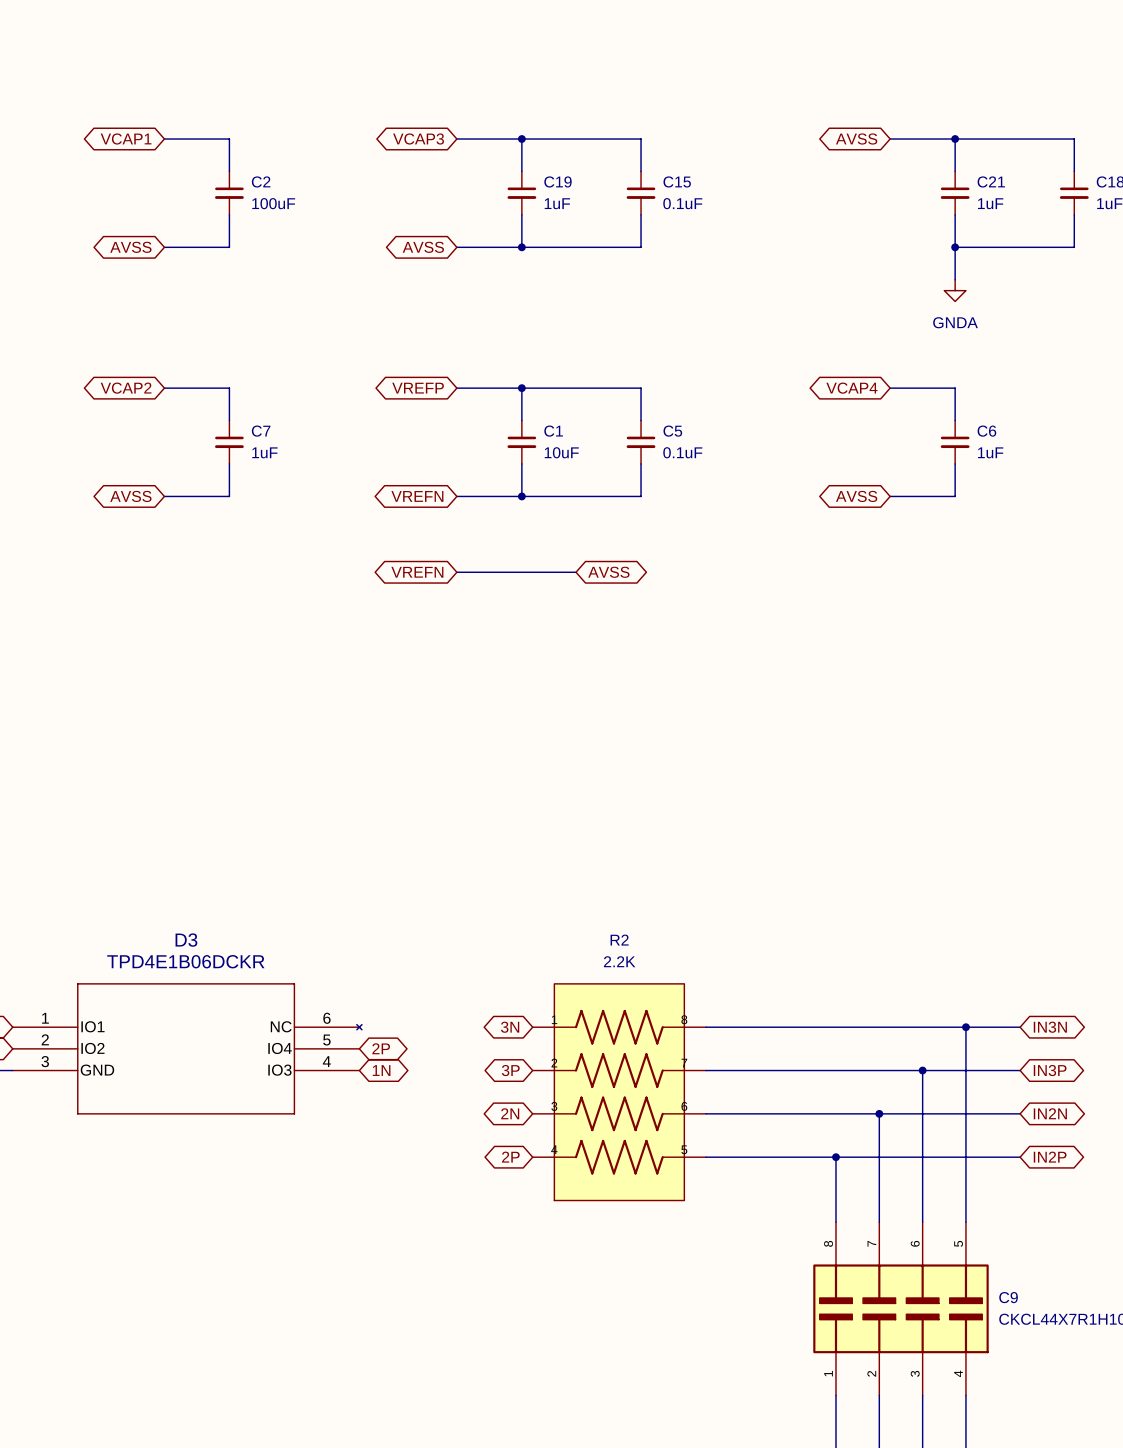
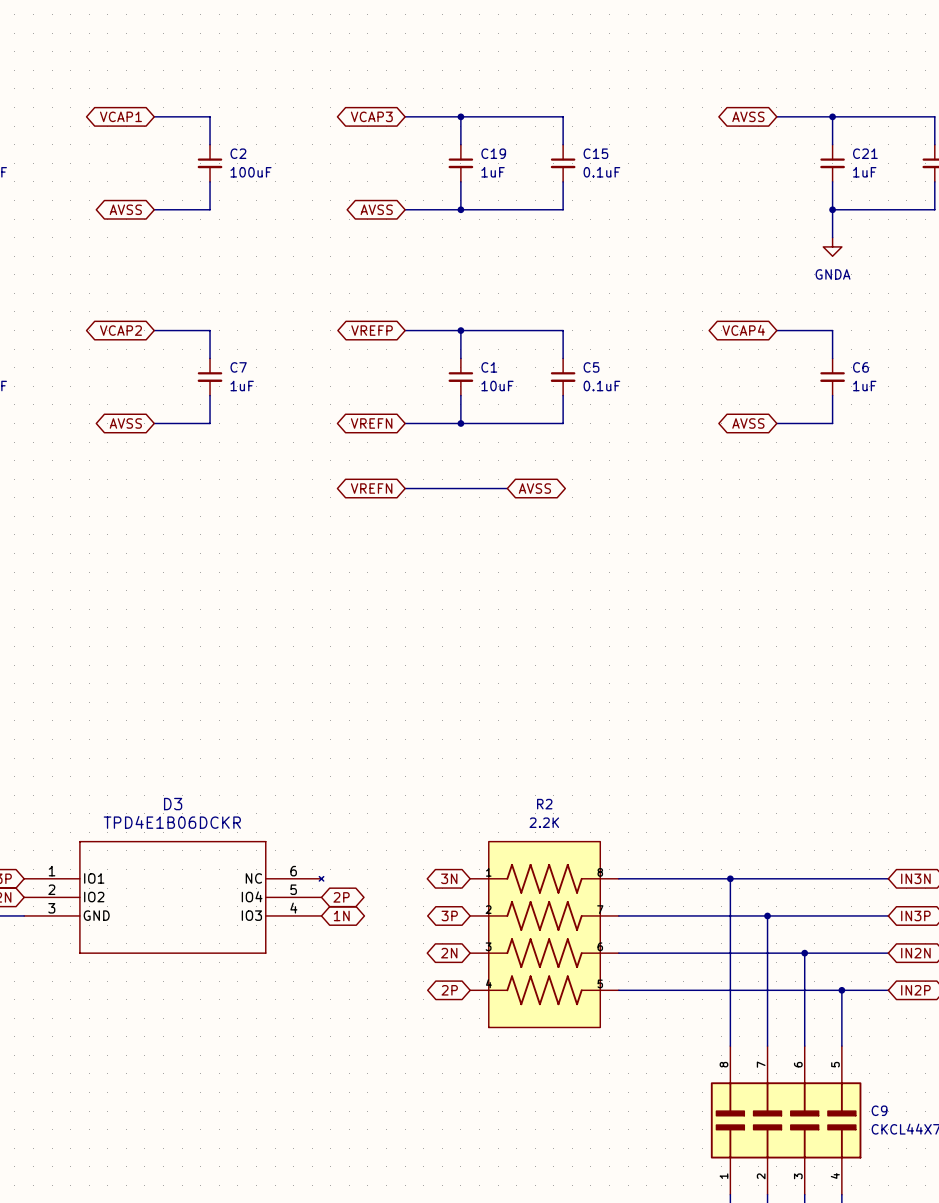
junction: none -> (730, 878)
wire: (965, 1027) (965, 1157) -> (730, 878) (730, 990)
junction: (965, 1027) -> none
junction: none -> (767, 915)
wire: (922, 1070) (922, 1113) -> (767, 915) (767, 953)
junction: (922, 1070) -> none
junction: (879, 1113) -> none
junction: none -> (804, 953)
junction: (835, 1157) -> none
junction: none -> (841, 990)

